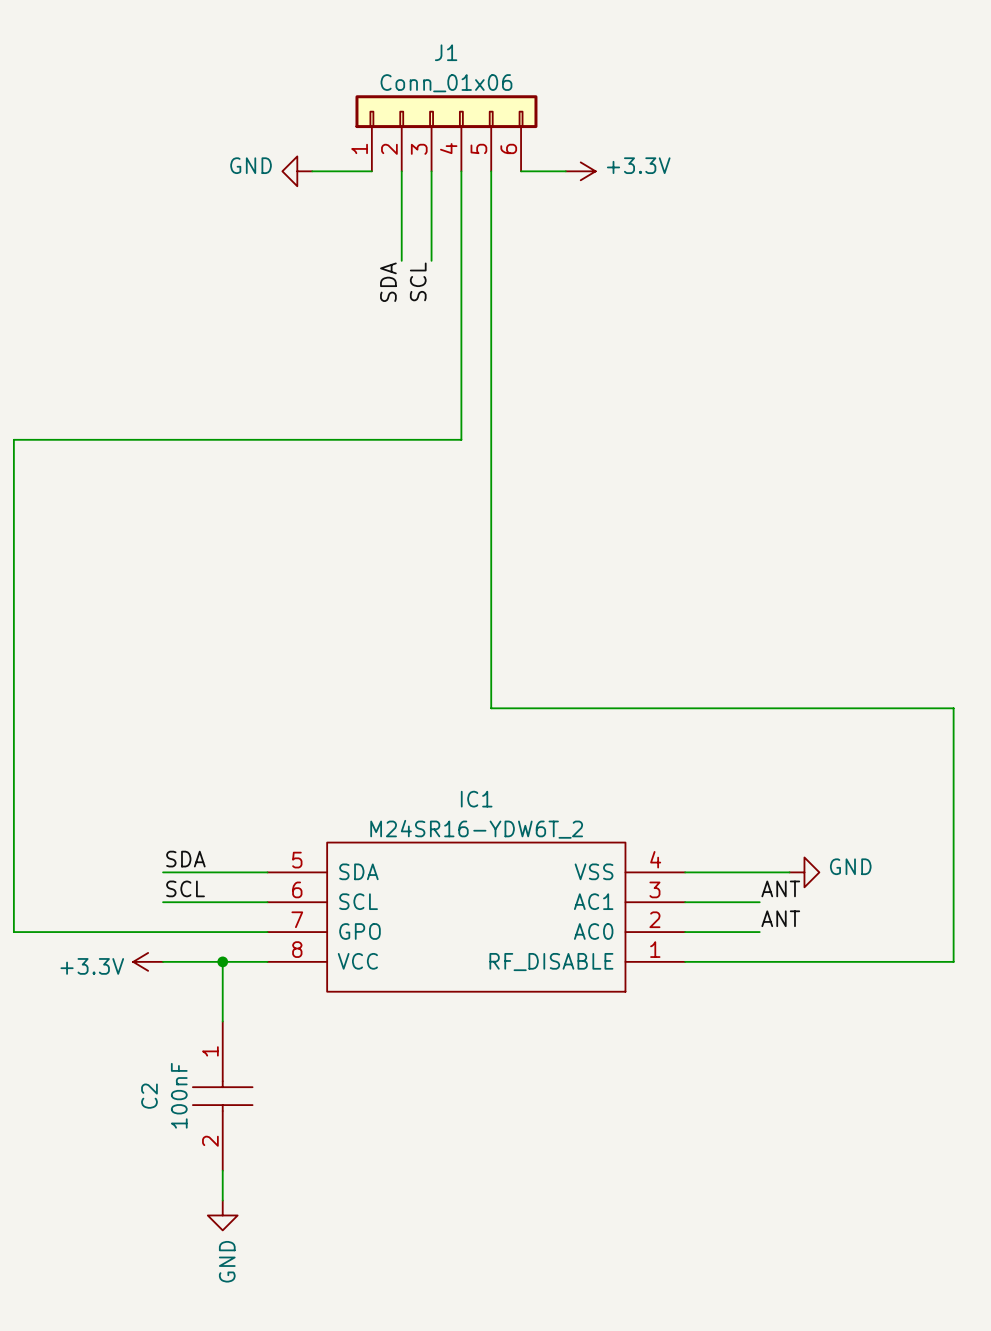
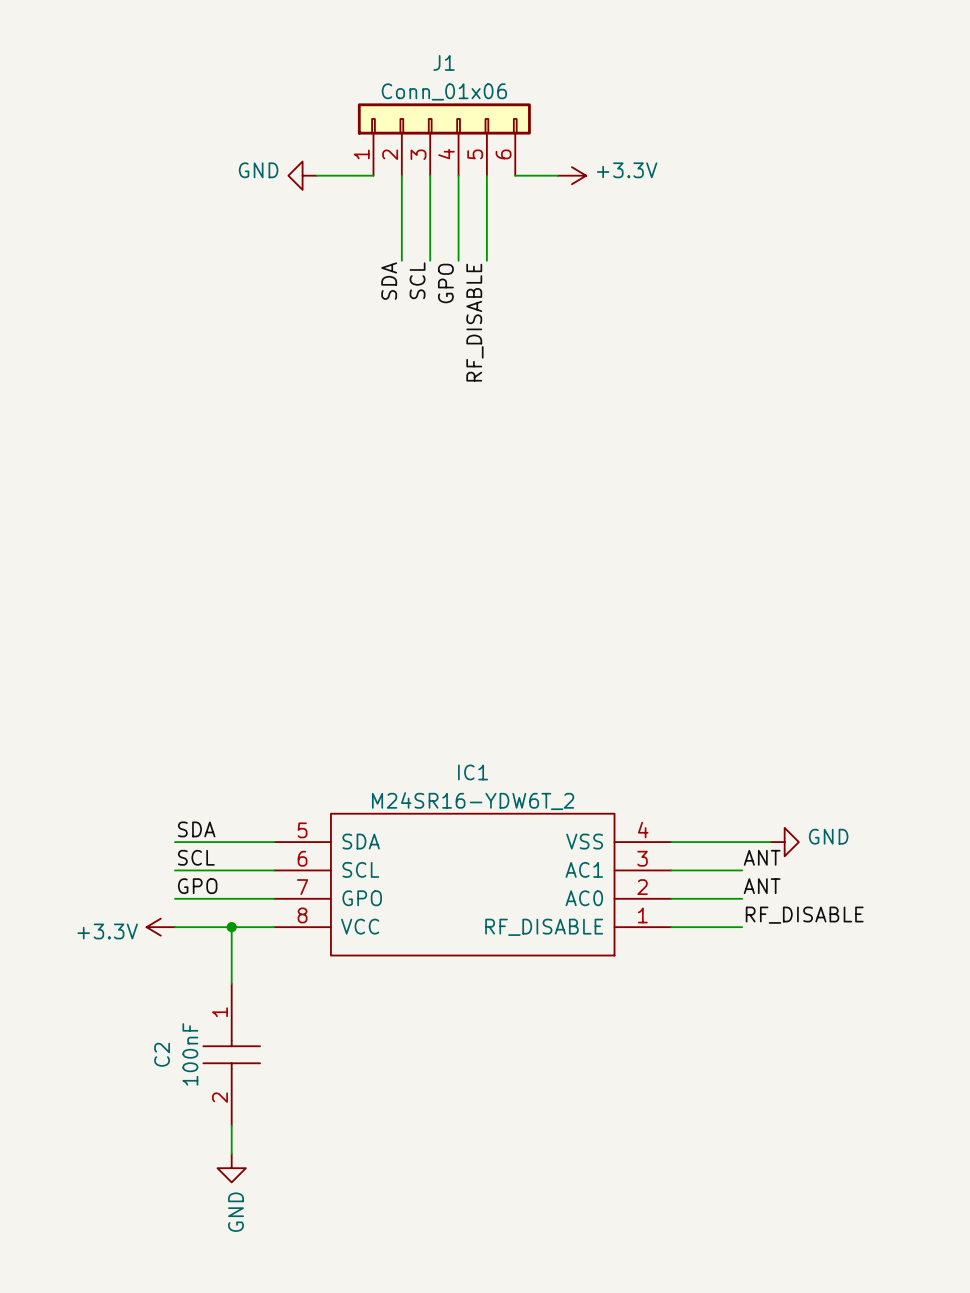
wire: (461, 260) (461, 439) (13, 439) (13, 932) (163, 932) -> none
wire: (491, 260) (491, 708) (953, 708) (953, 961) (759, 961) -> none
label: none -> GPO (445, 283)
label: none -> RF_DISABLE (474, 322)
label: none -> GPO (197, 886)
label: none -> RF_DISABLE (804, 915)

